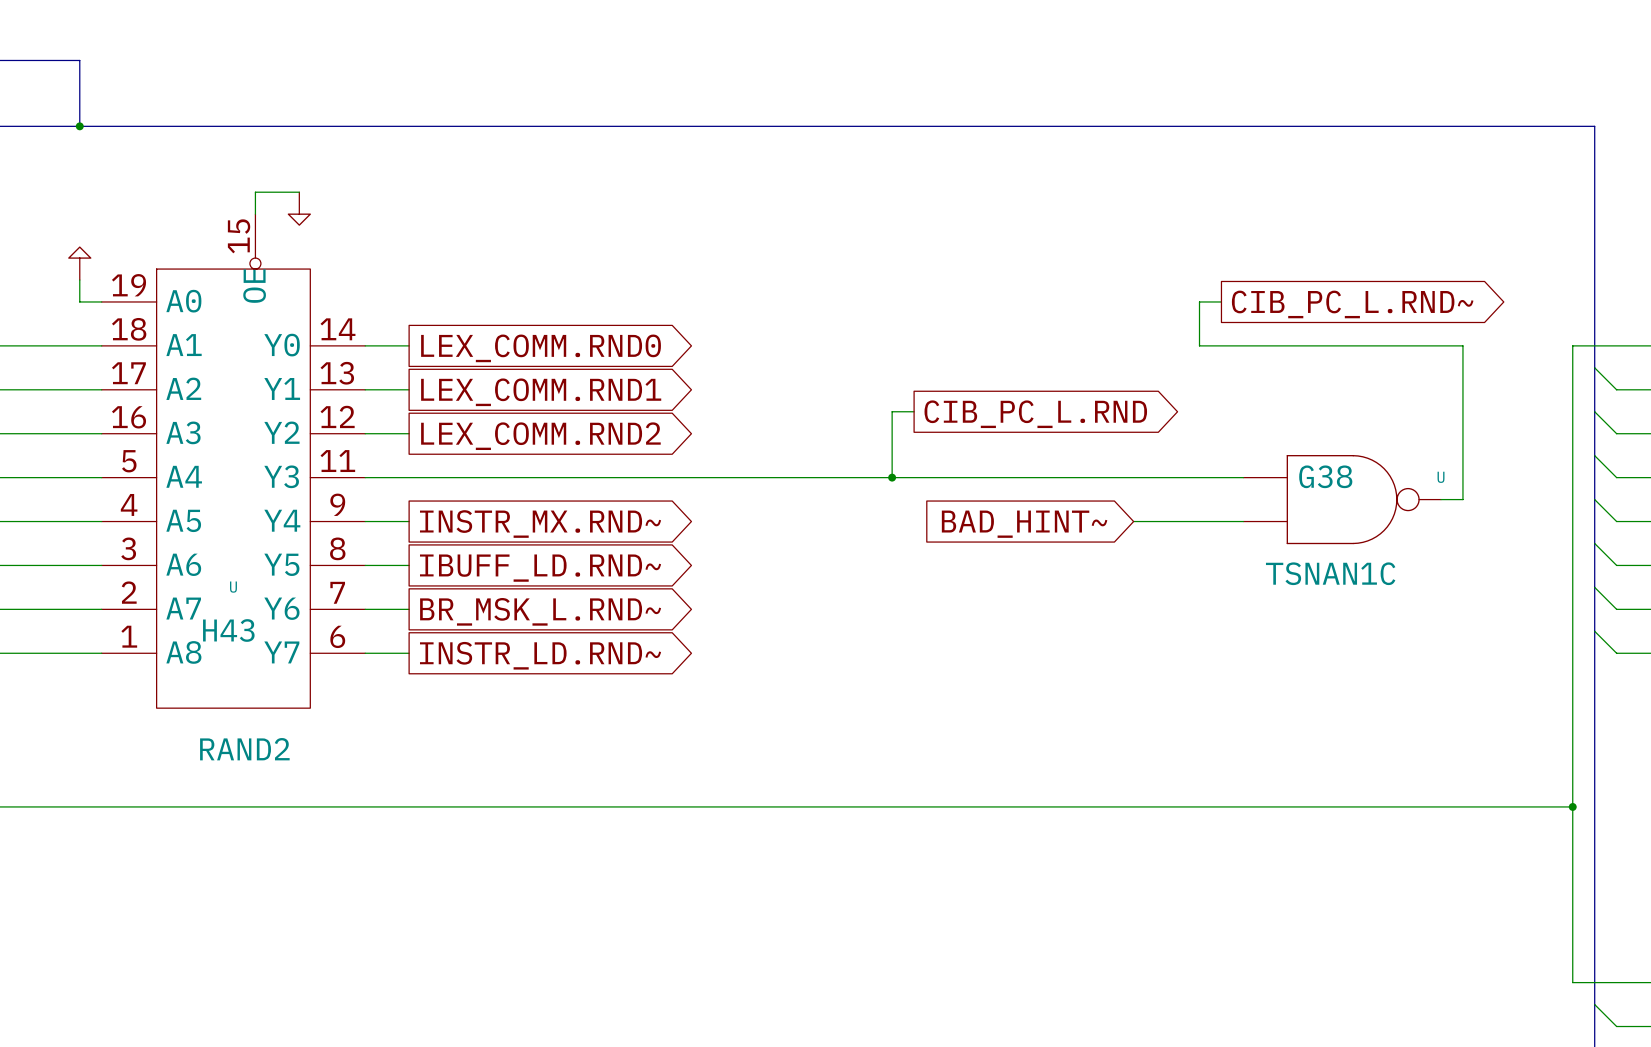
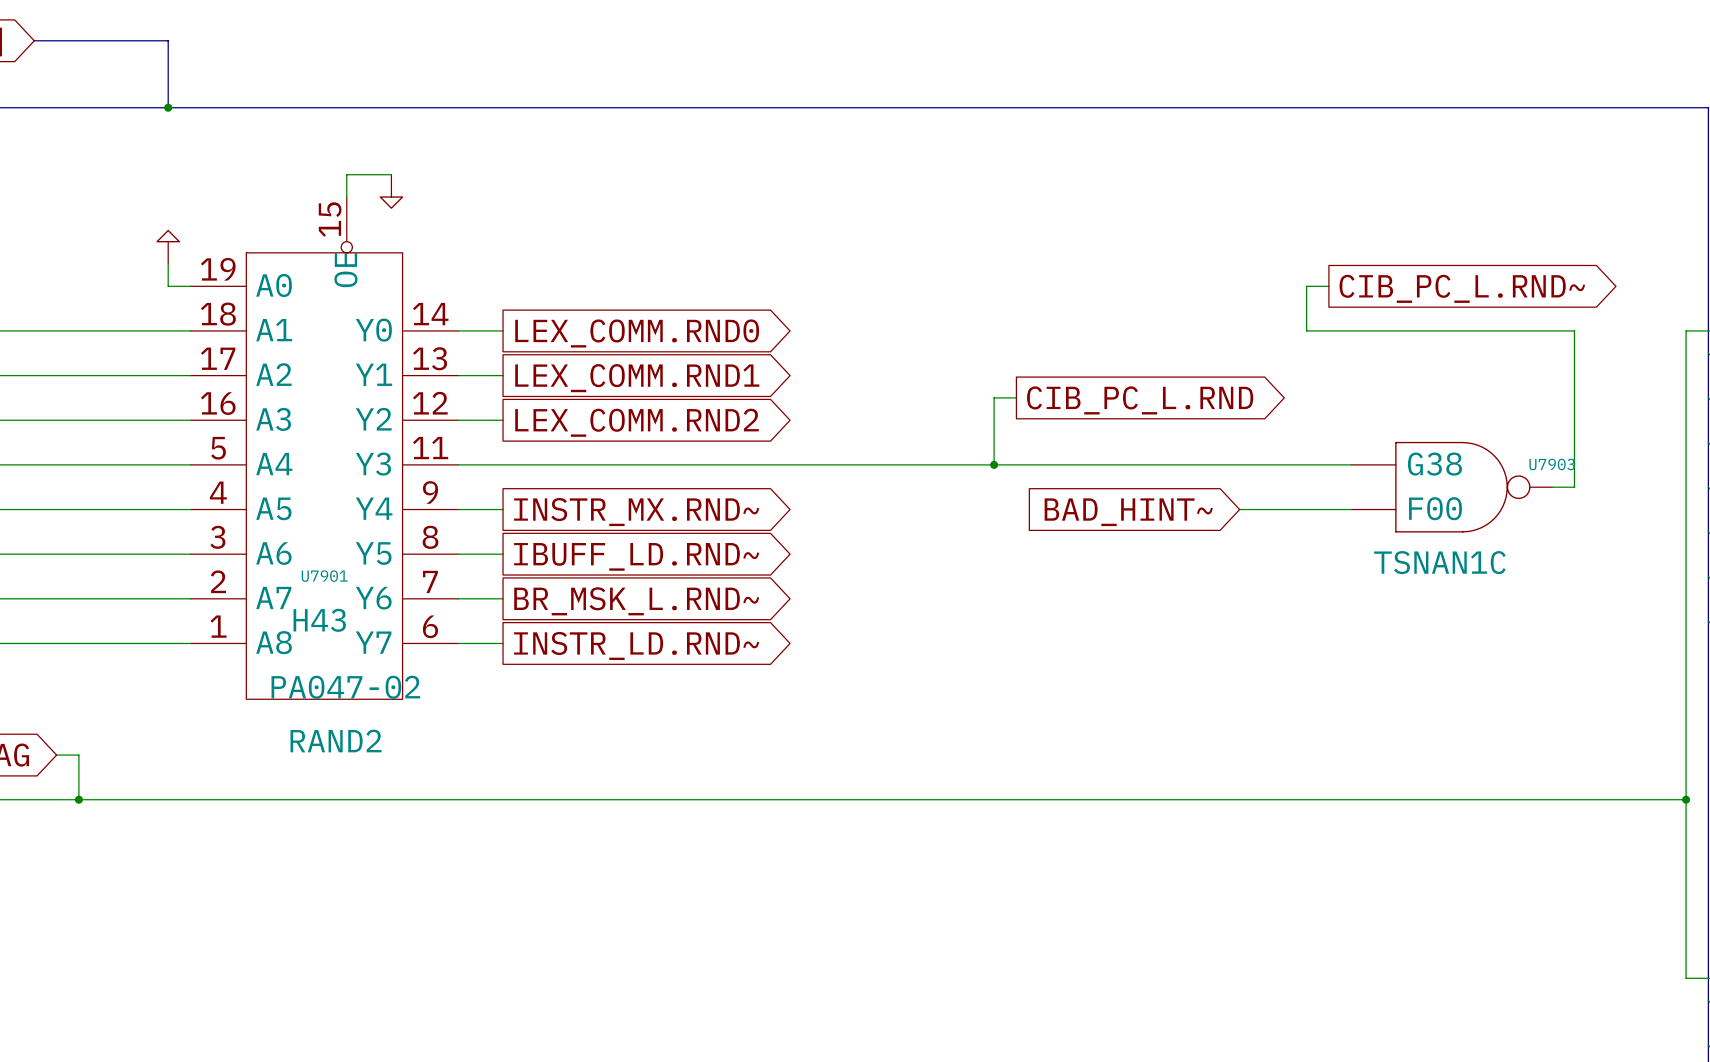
U name: U (1441, 477) -> U7903 (1552, 464)
U value: none -> F00 (1435, 508)
U name: U (233, 587) -> U7901 (324, 576)
U value: none -> PA047-02 (345, 687)

